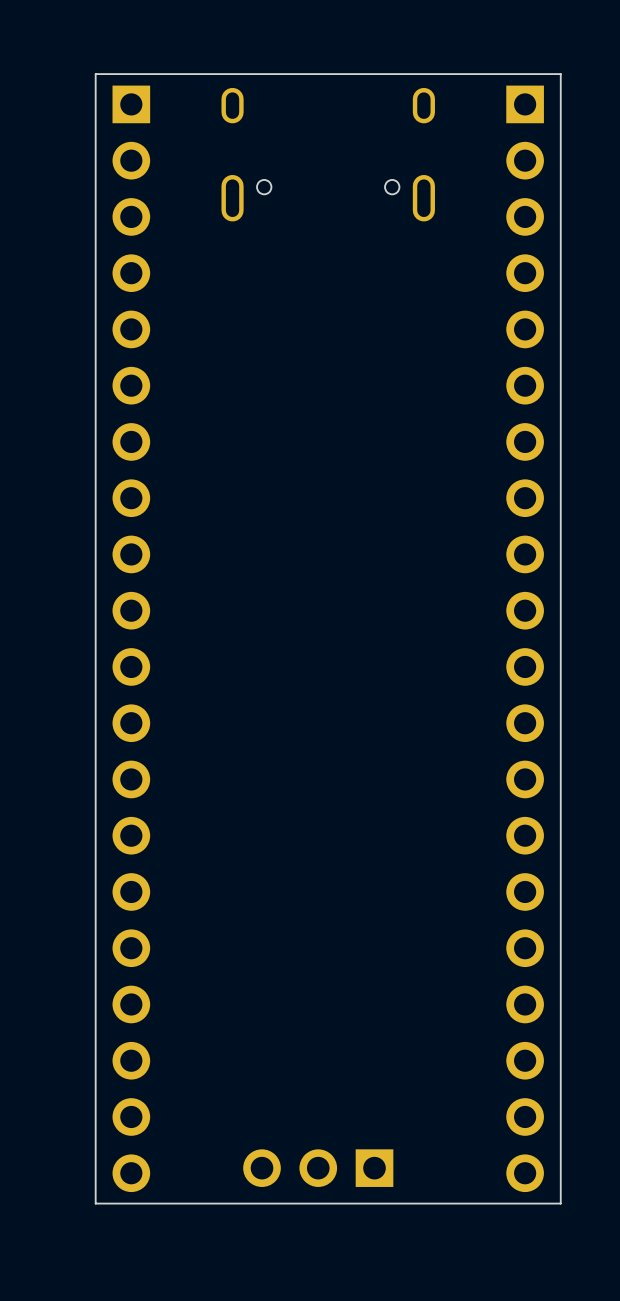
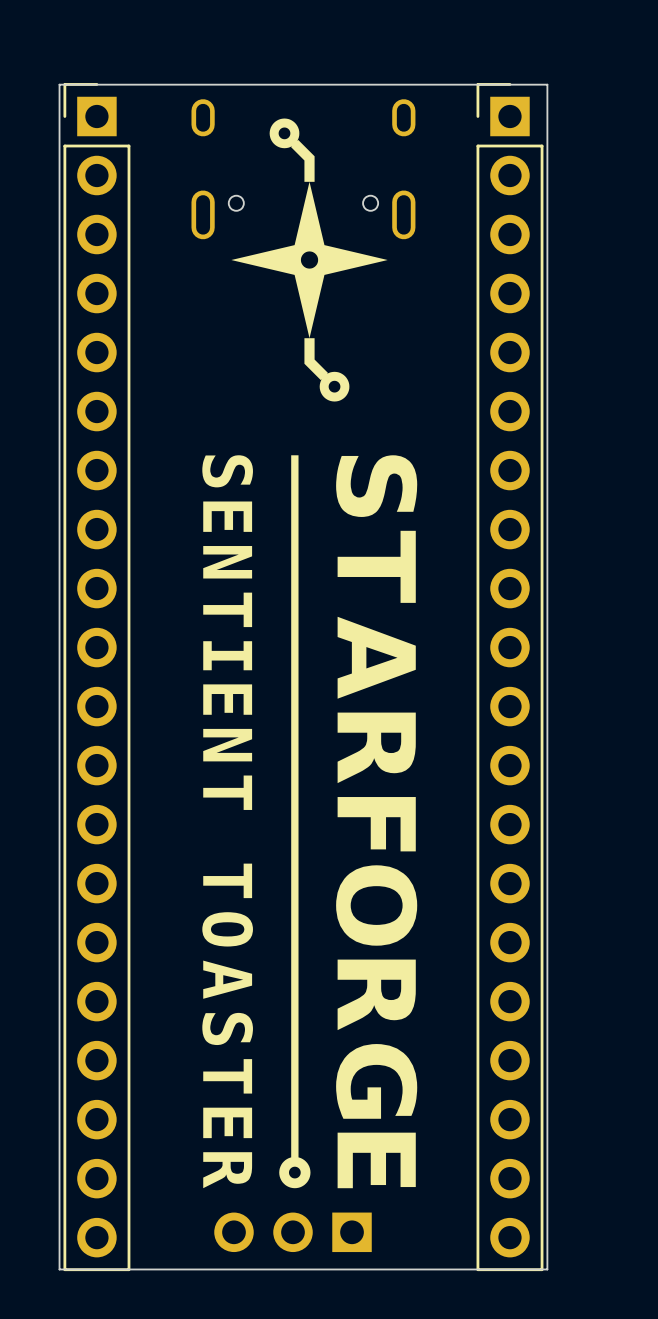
drawing: none -> [231, 118, 388, 402]
drawing: none -> [202, 455, 418, 1189]
part side: top (131, 638) -> bottom (96, 677)
part side: top (525, 638) -> bottom (509, 677)

